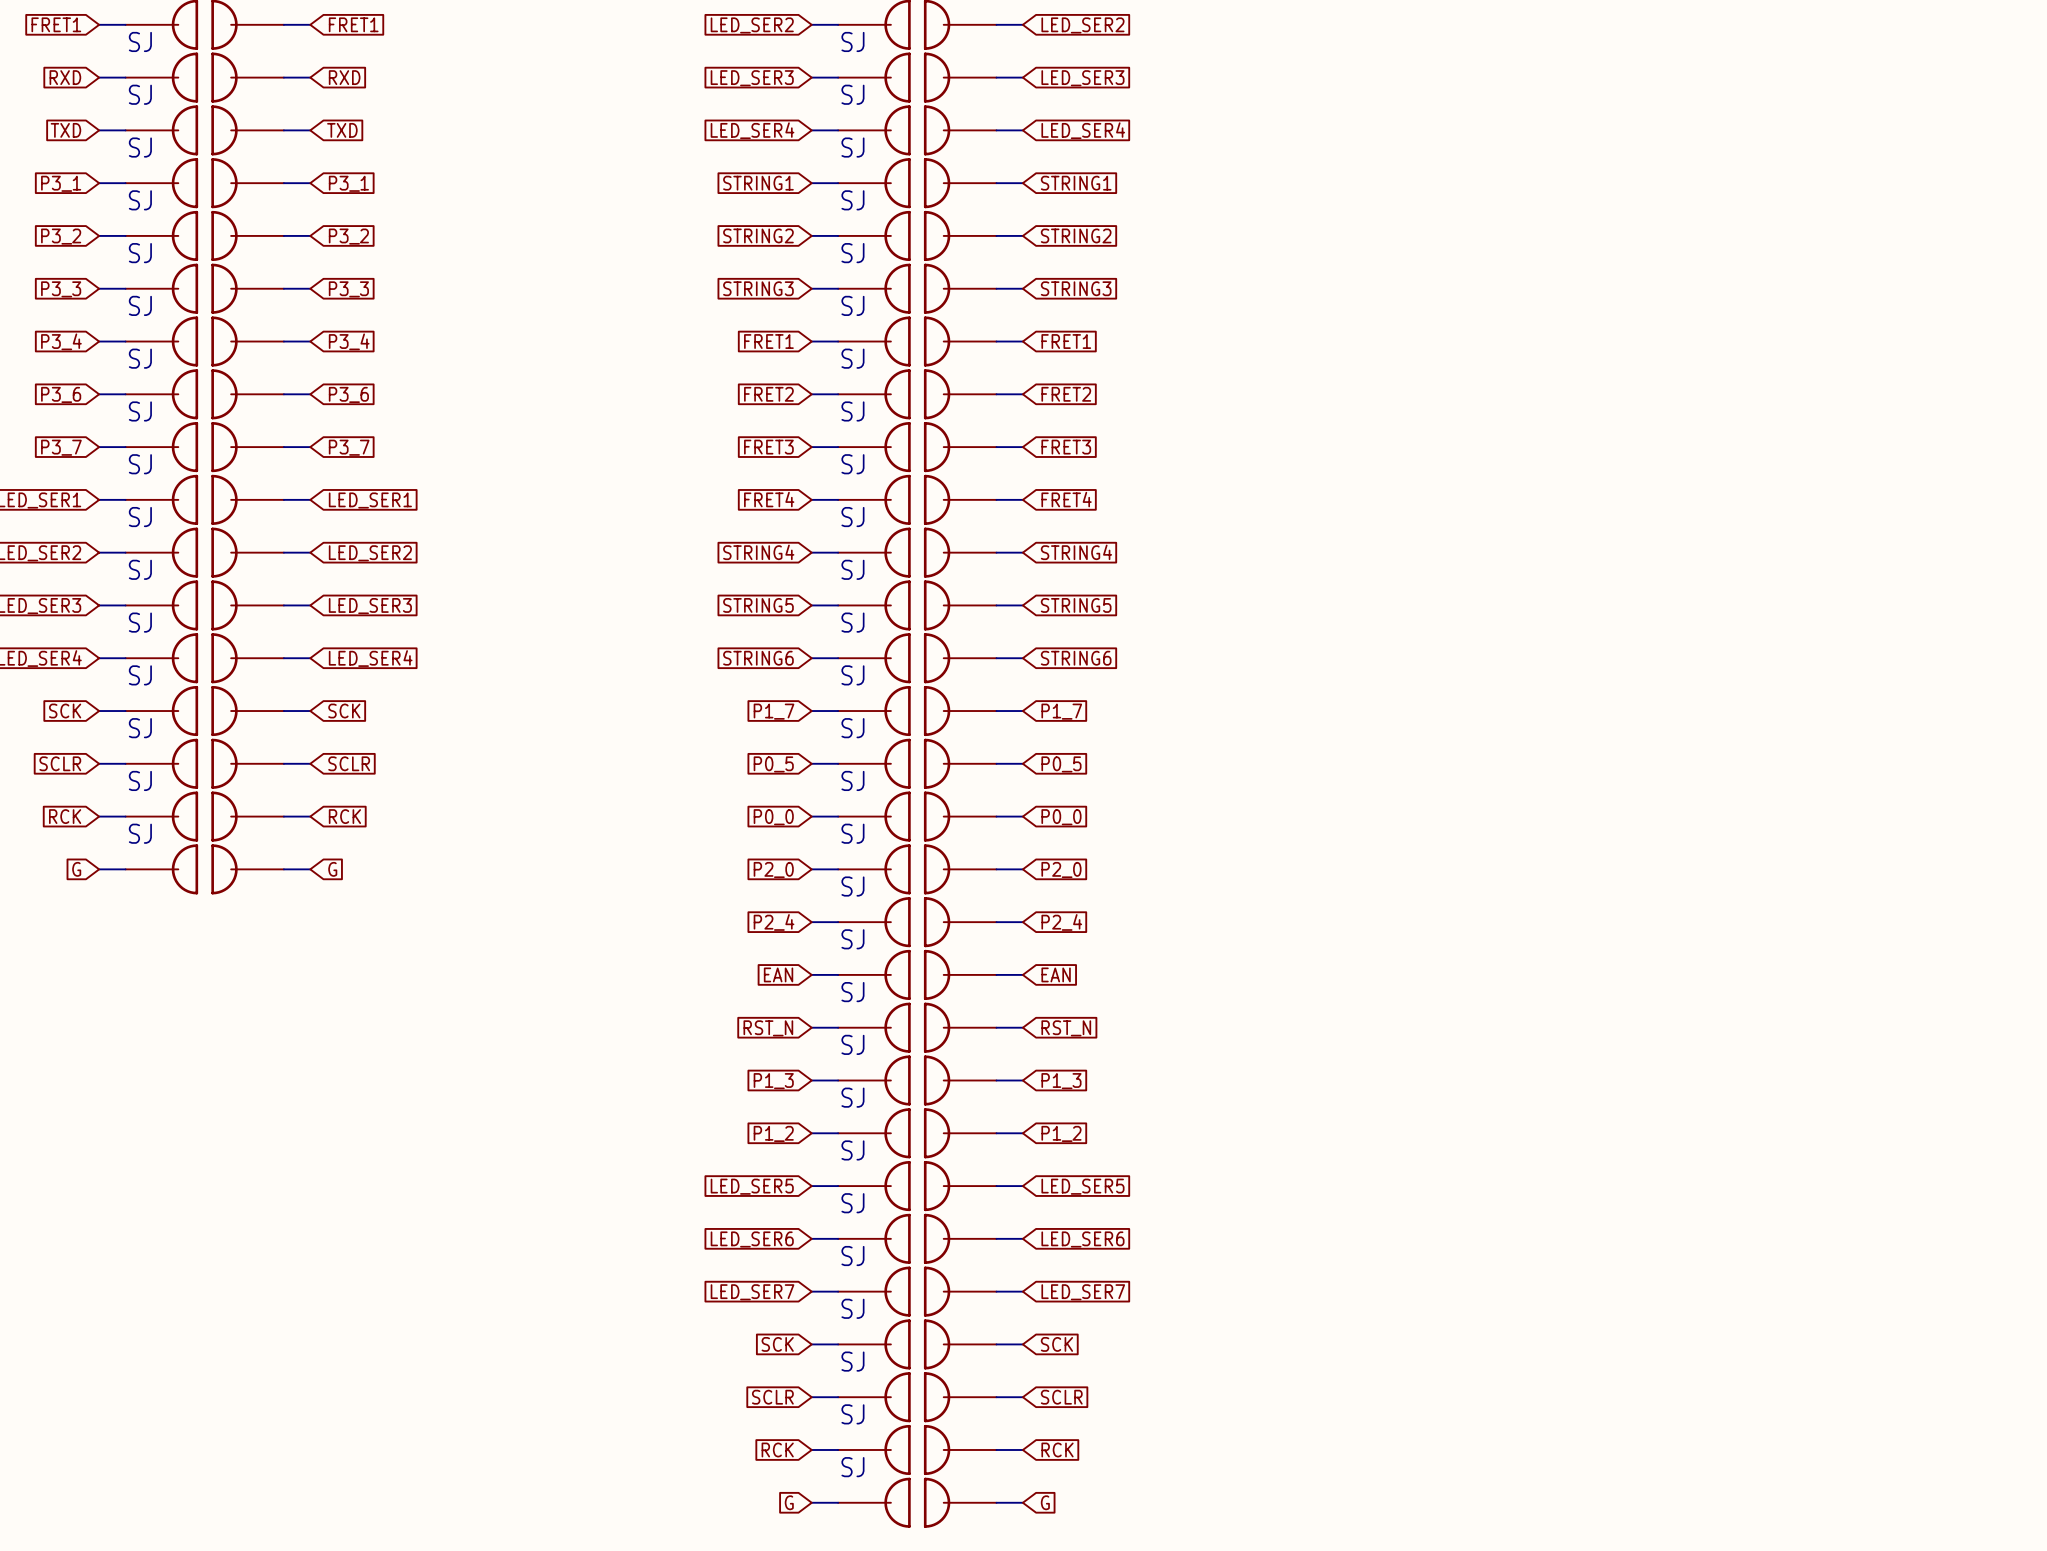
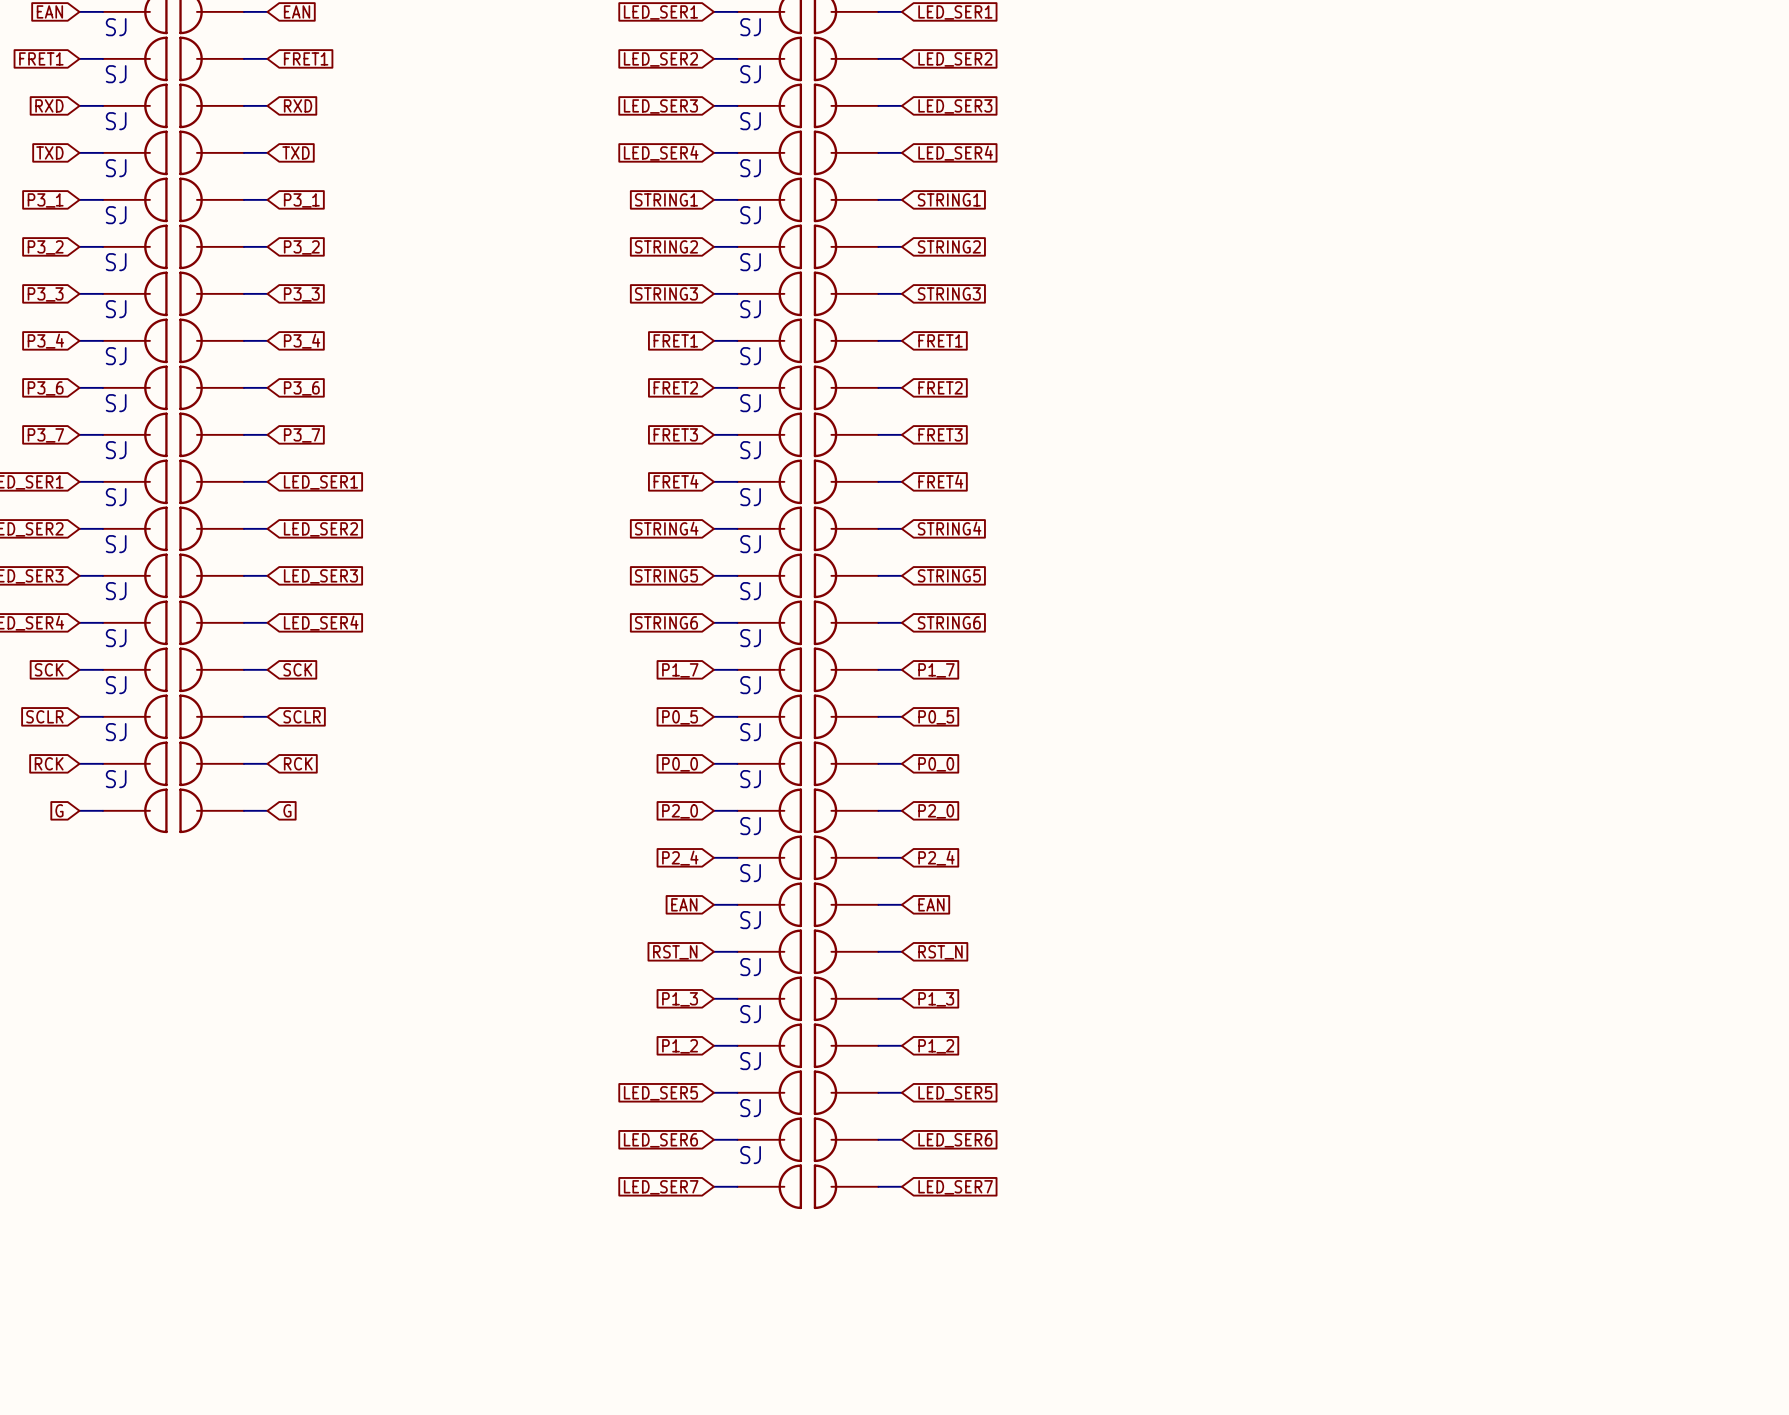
global label: SCK (777, 1344) -> none
wire: (811, 1344) (838, 1344) -> none
part: (917, 1344) -> none
wire: (996, 1344) (1022, 1344) -> none
global label: SCK (1056, 1344) -> none
global label: SCLR (772, 1397) -> none
wire: (811, 1397) (838, 1397) -> none
part: (917, 1397) -> none
wire: (996, 1397) (1022, 1397) -> none
global label: SCLR (1061, 1397) -> none
global label: RCK (777, 1449) -> none
wire: (811, 1449) (838, 1449) -> none
part: (917, 1449) -> none
wire: (996, 1449) (1022, 1449) -> none
global label: RCK (1057, 1449) -> none
global label: G (789, 1502) -> none
wire: (811, 1502) (838, 1502) -> none
part: (917, 1502) -> none
wire: (996, 1502) (1022, 1502) -> none
global label: G (1045, 1502) -> none

